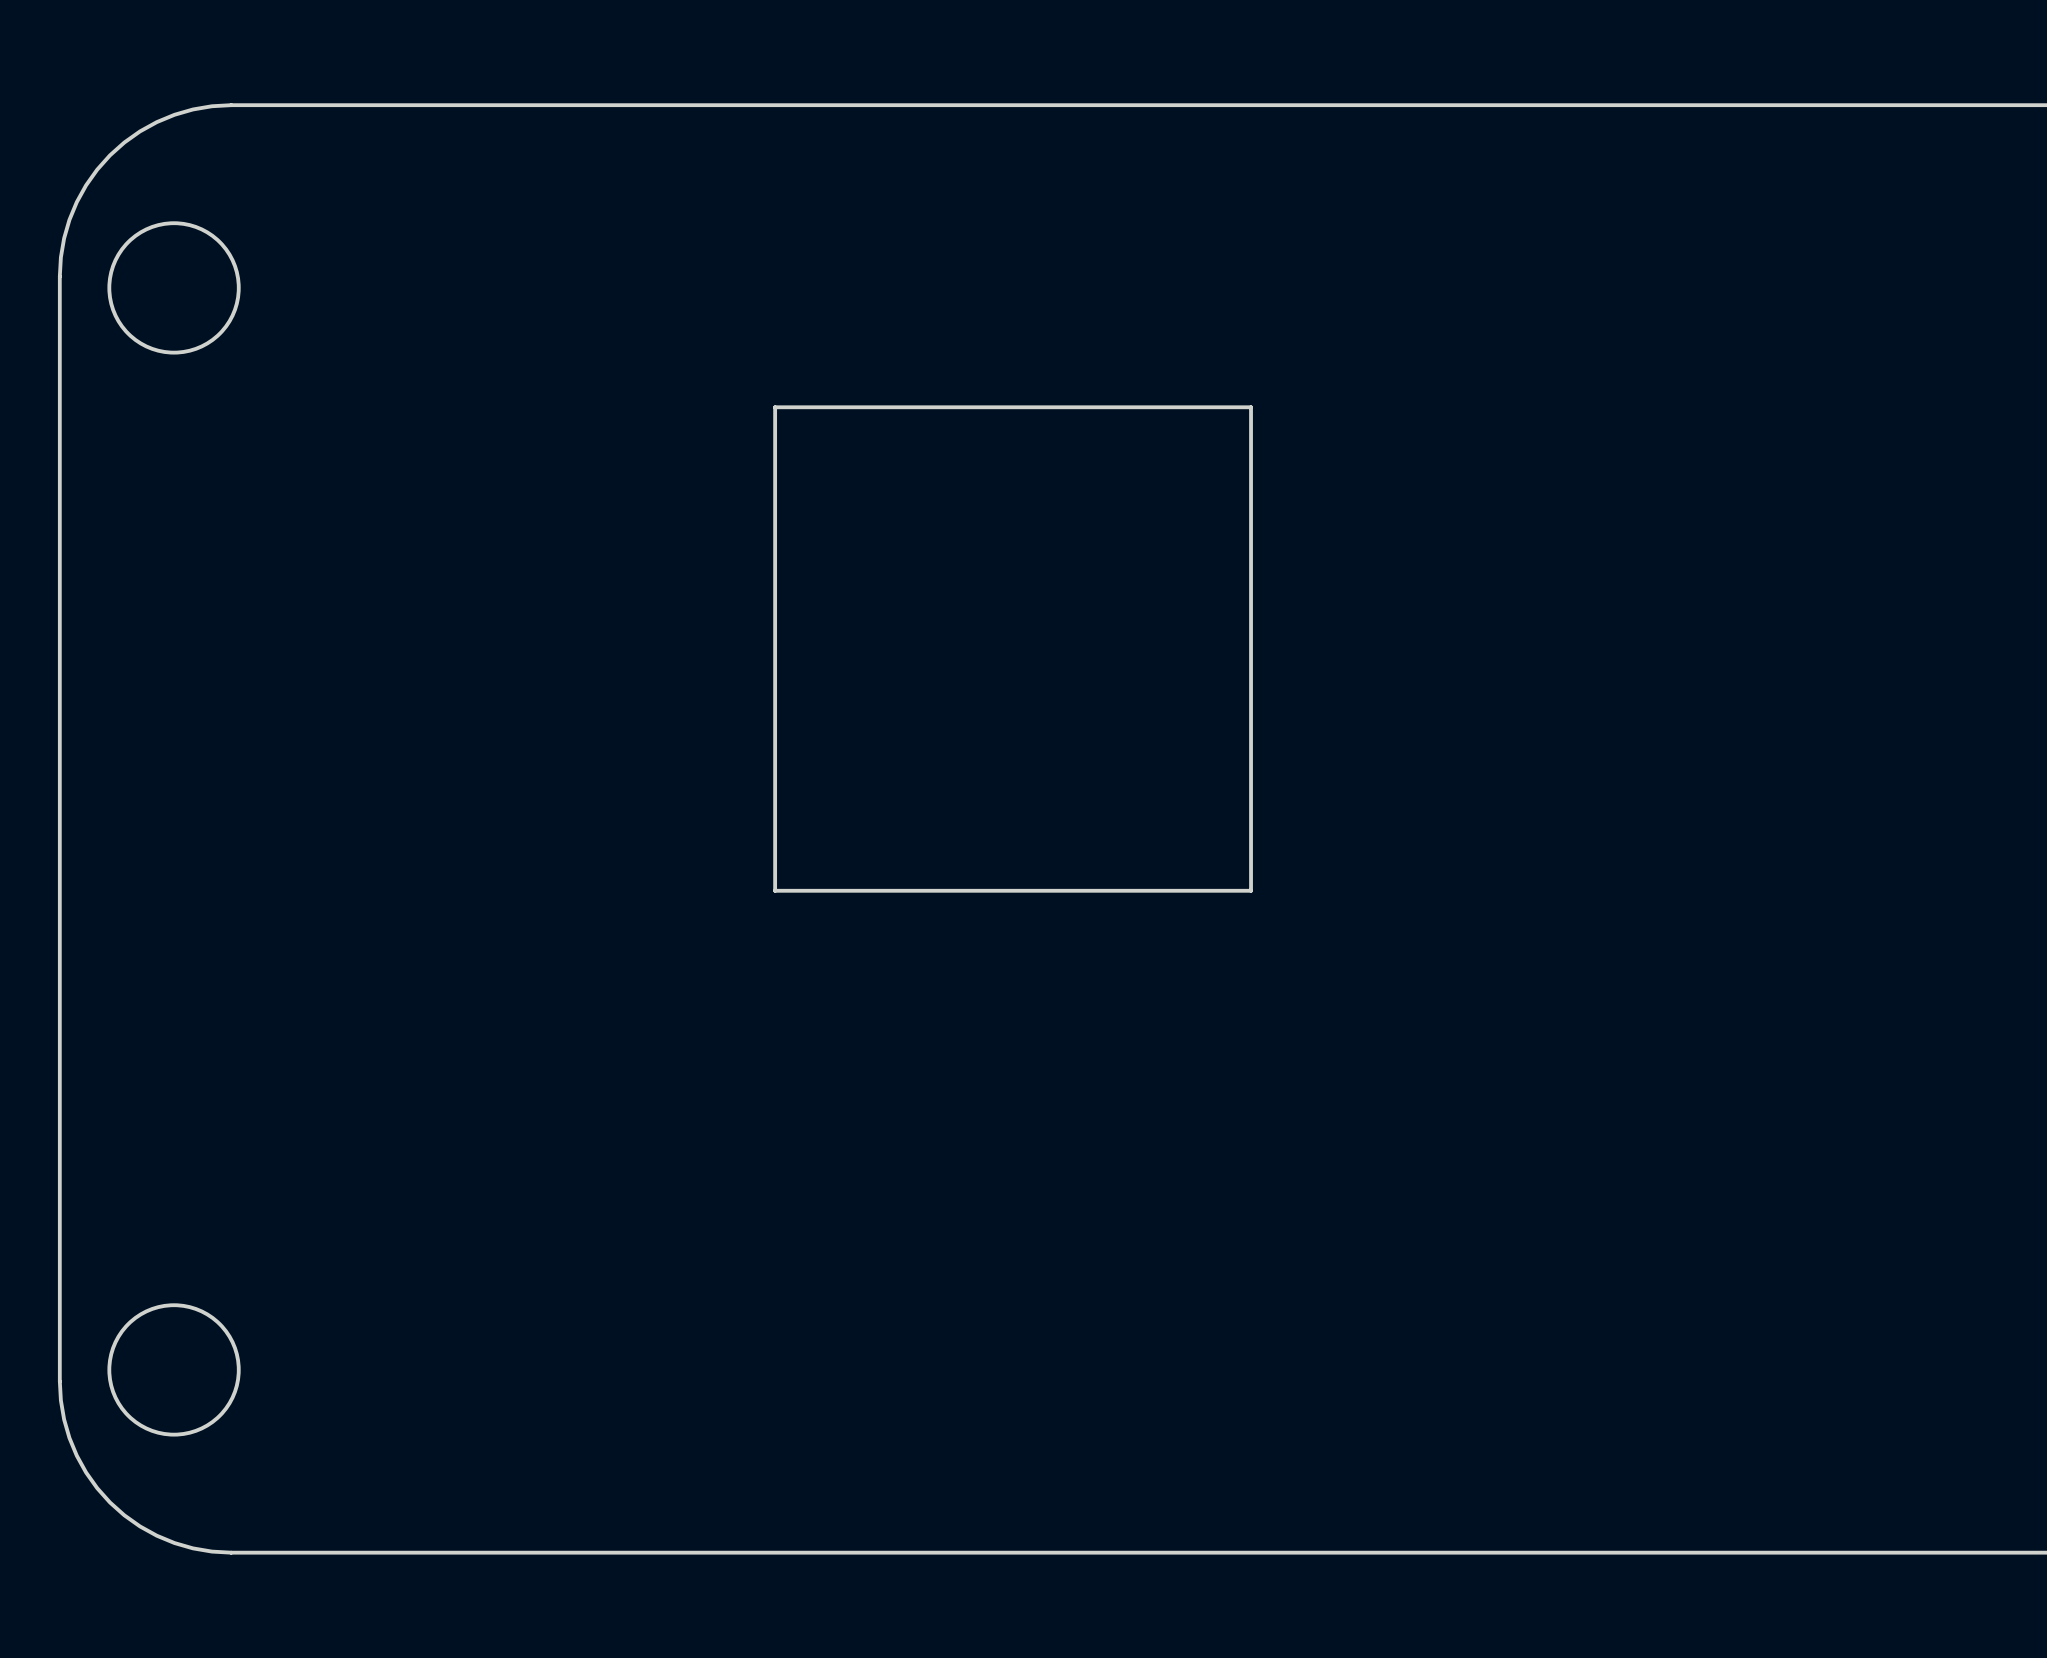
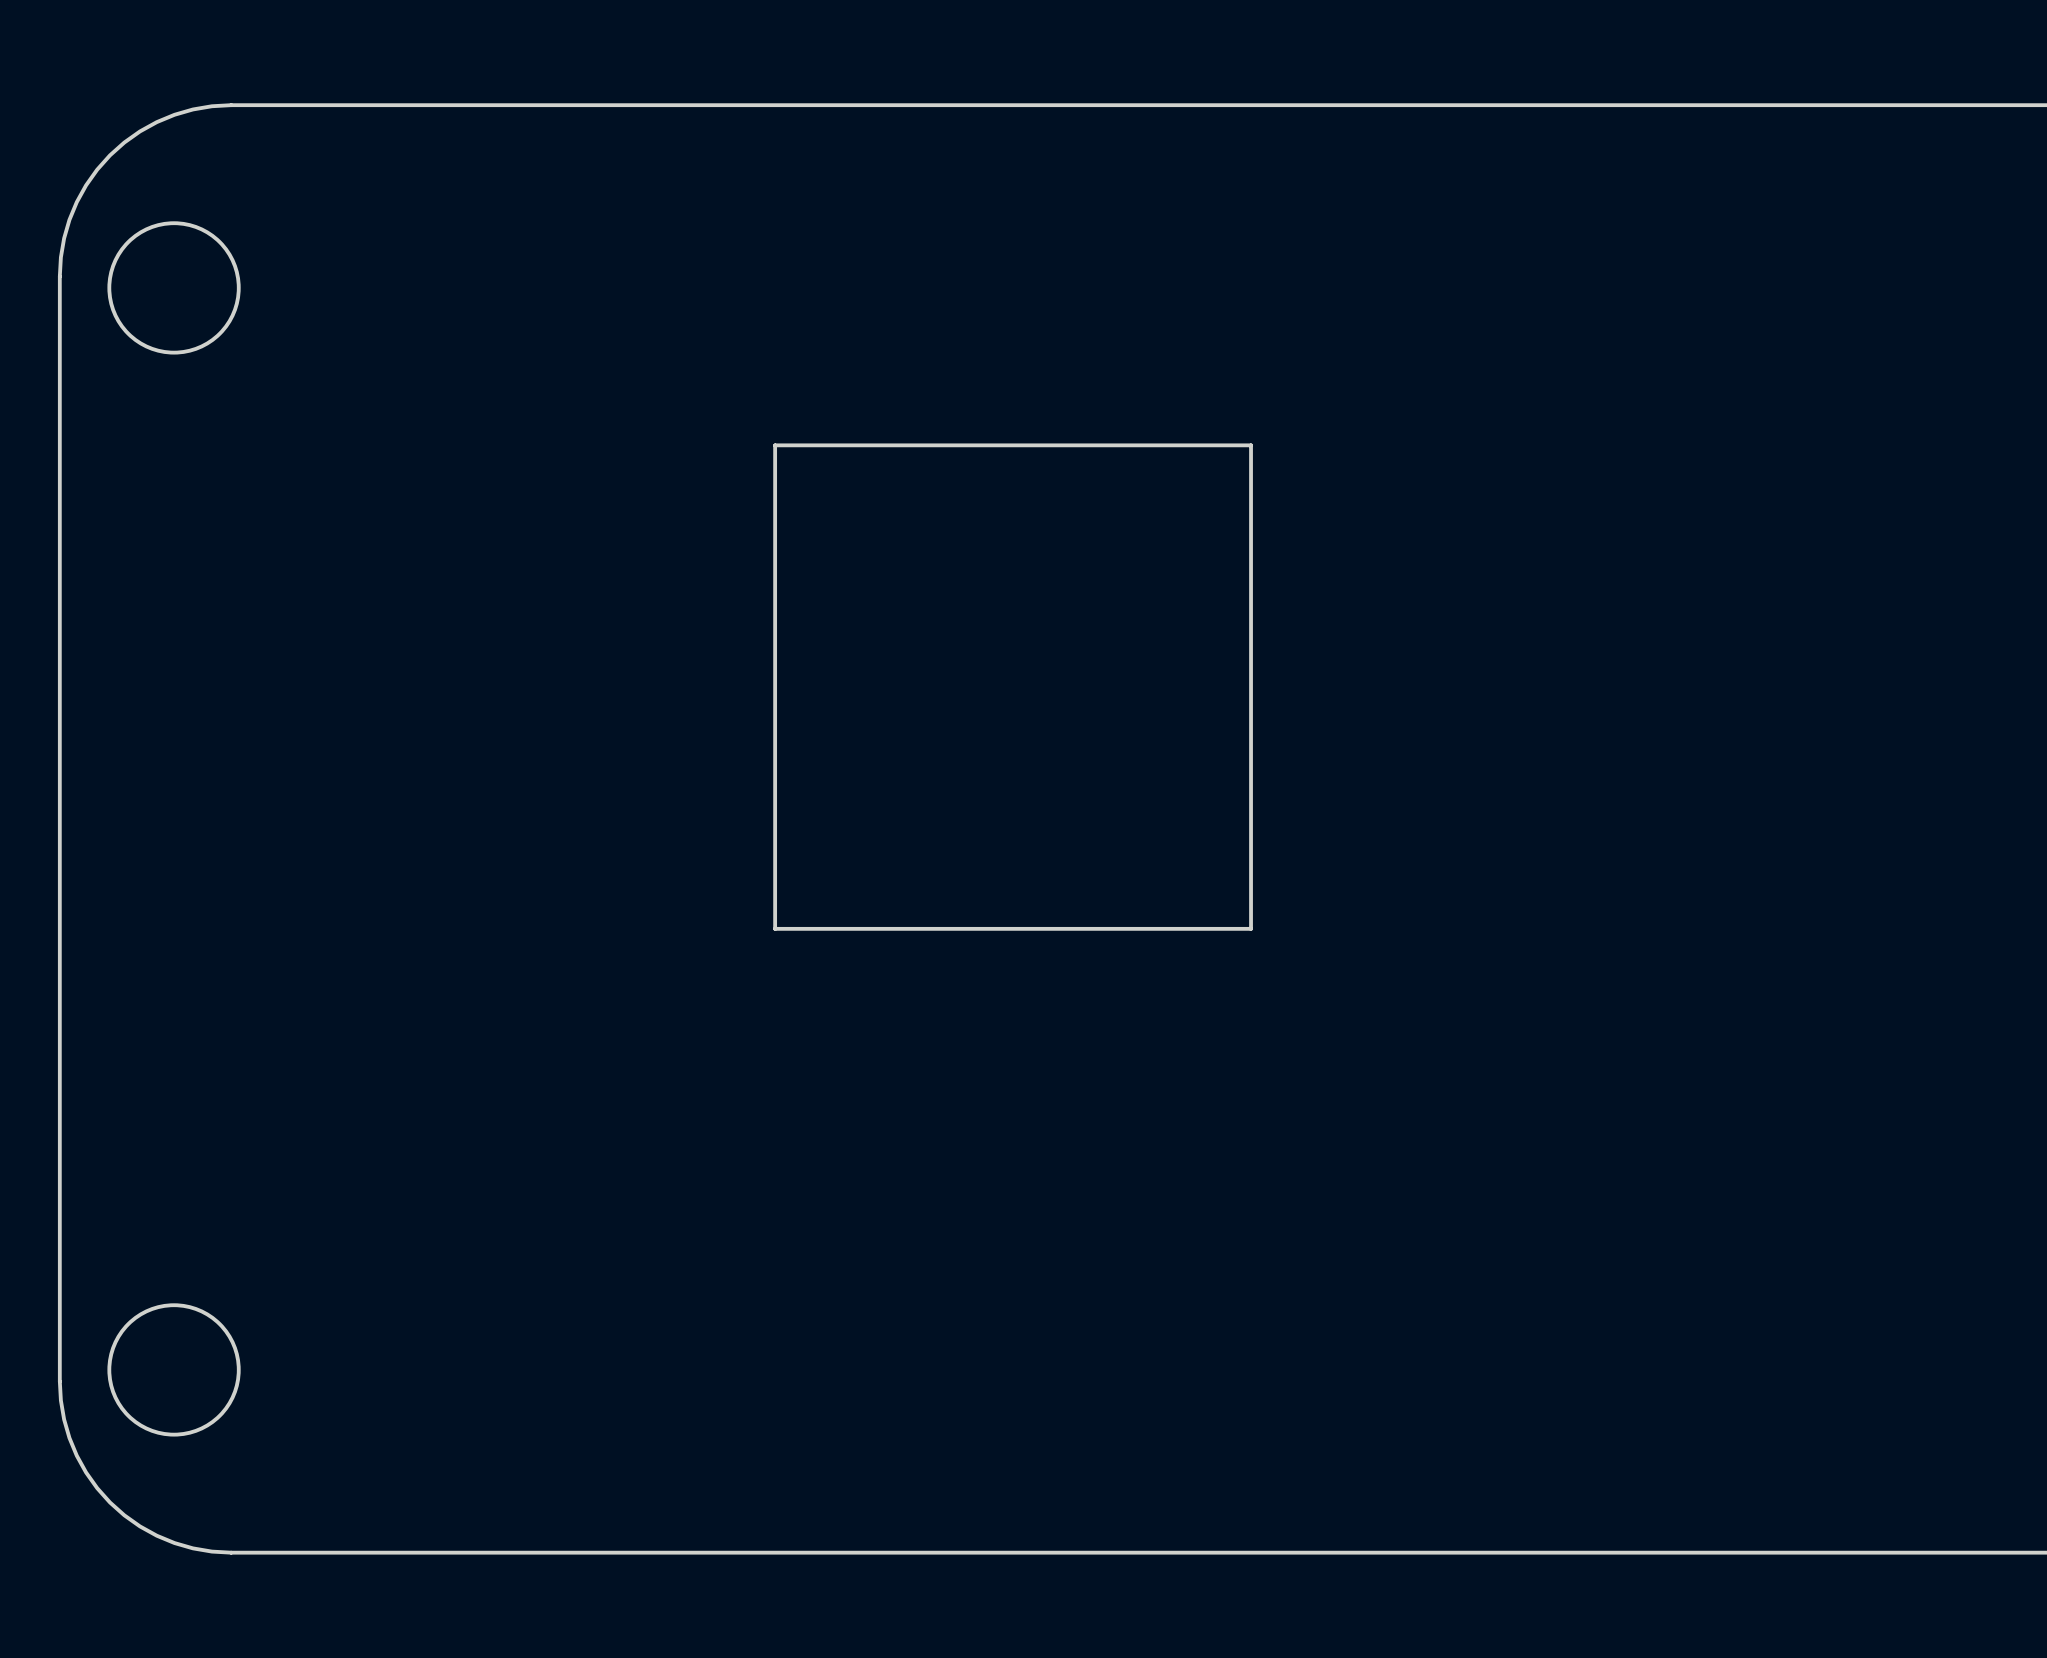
board edge: (775, 445) (775, 407) (1251, 407) (1251, 445) -> (775, 445) (1251, 445)
board edge: (775, 890) (1251, 890) -> (775, 890) (775, 928) (1251, 928) (1251, 890)

